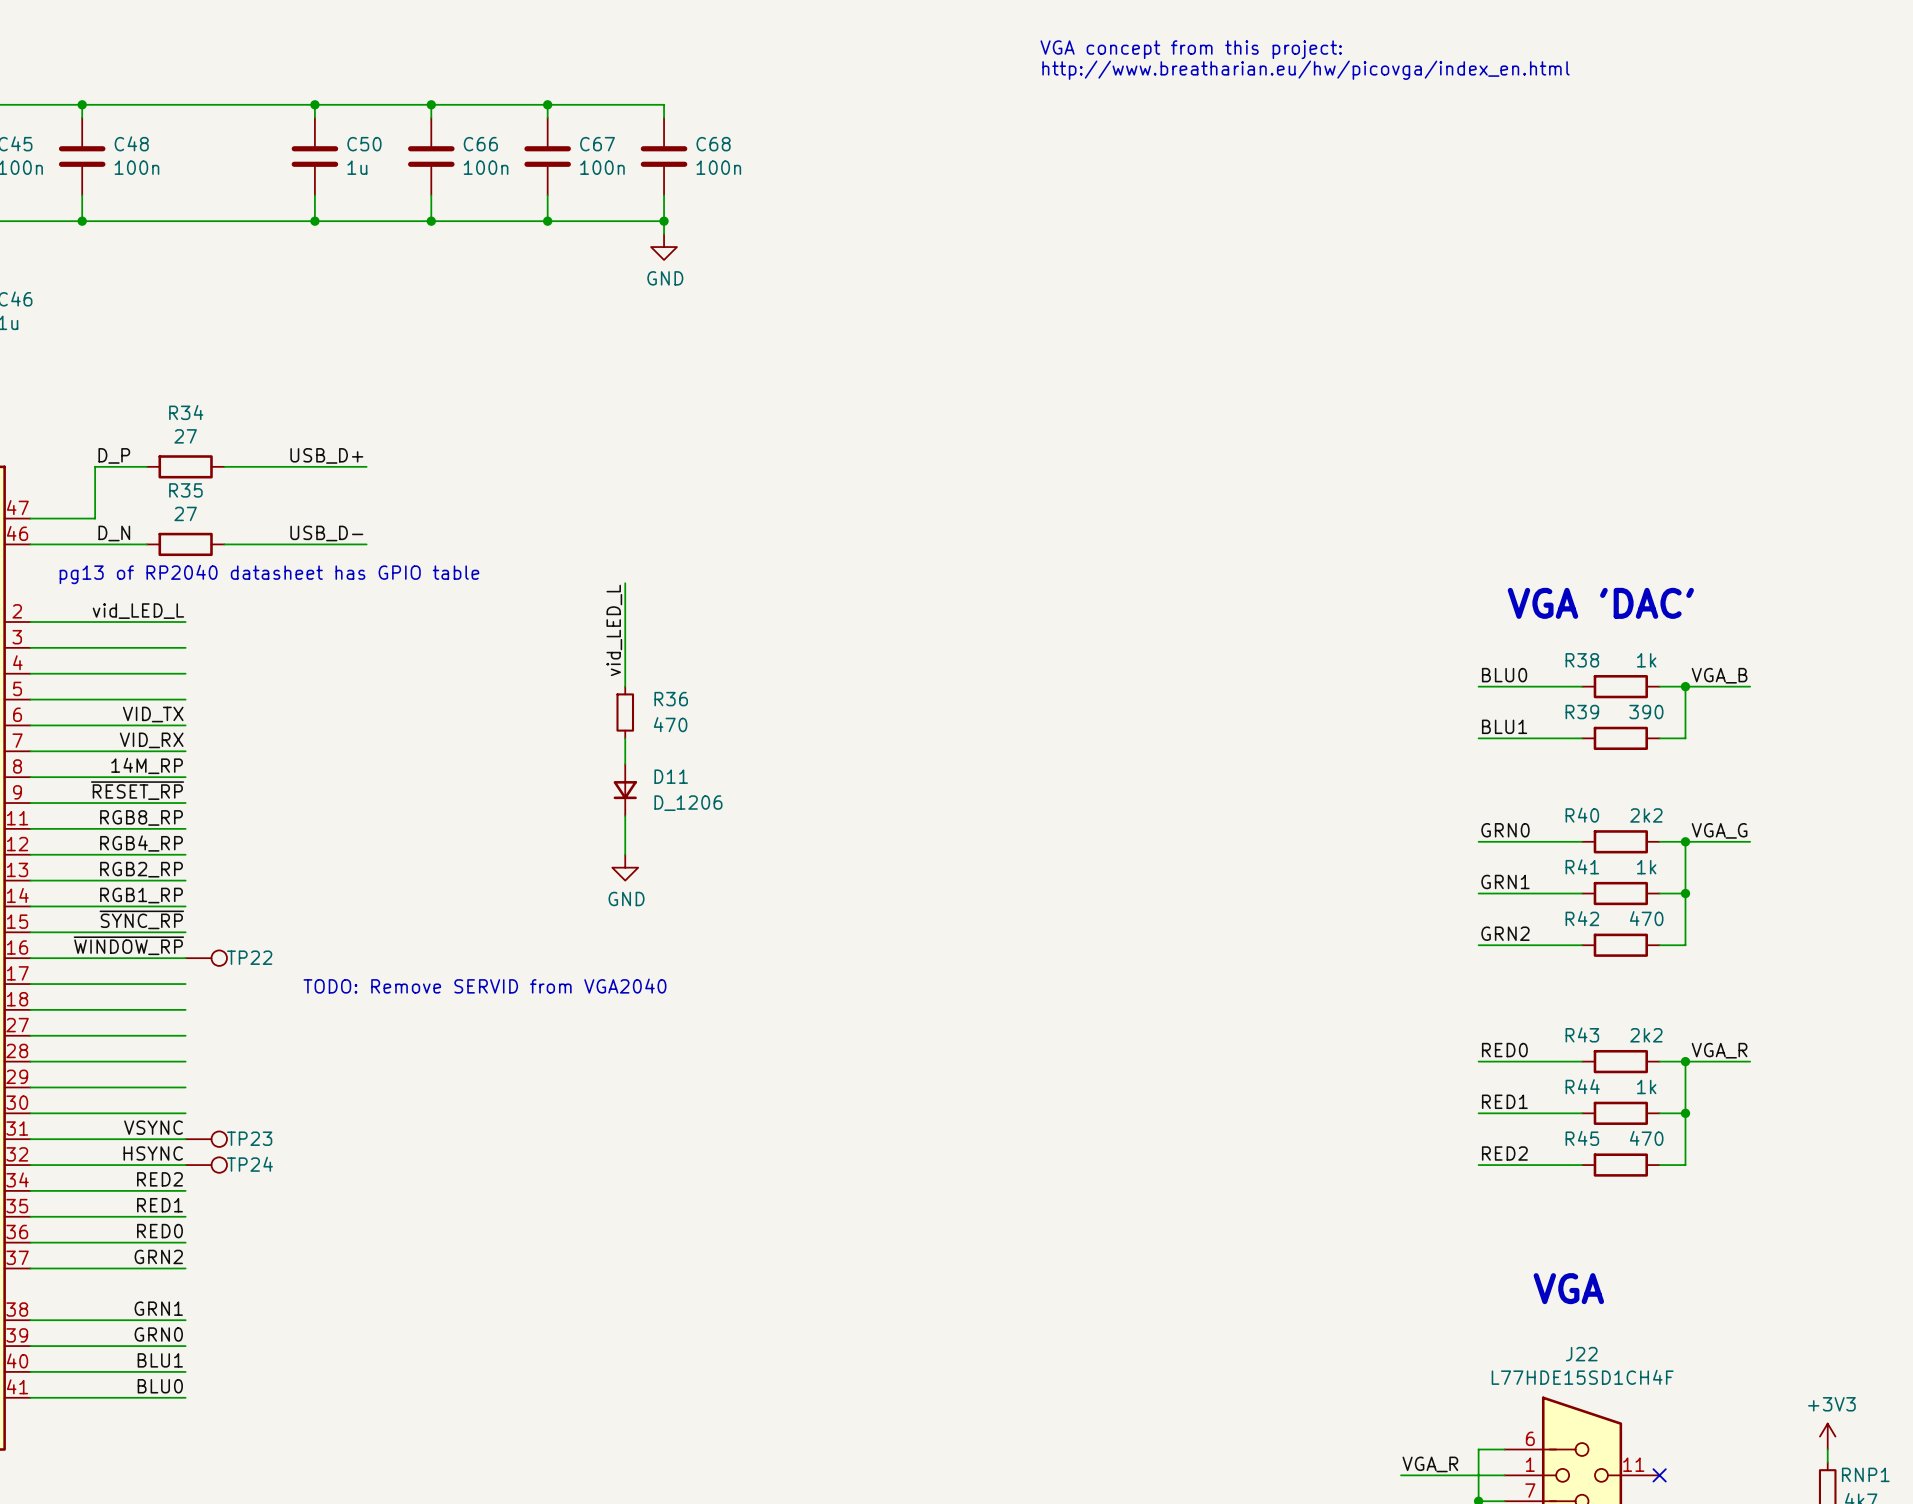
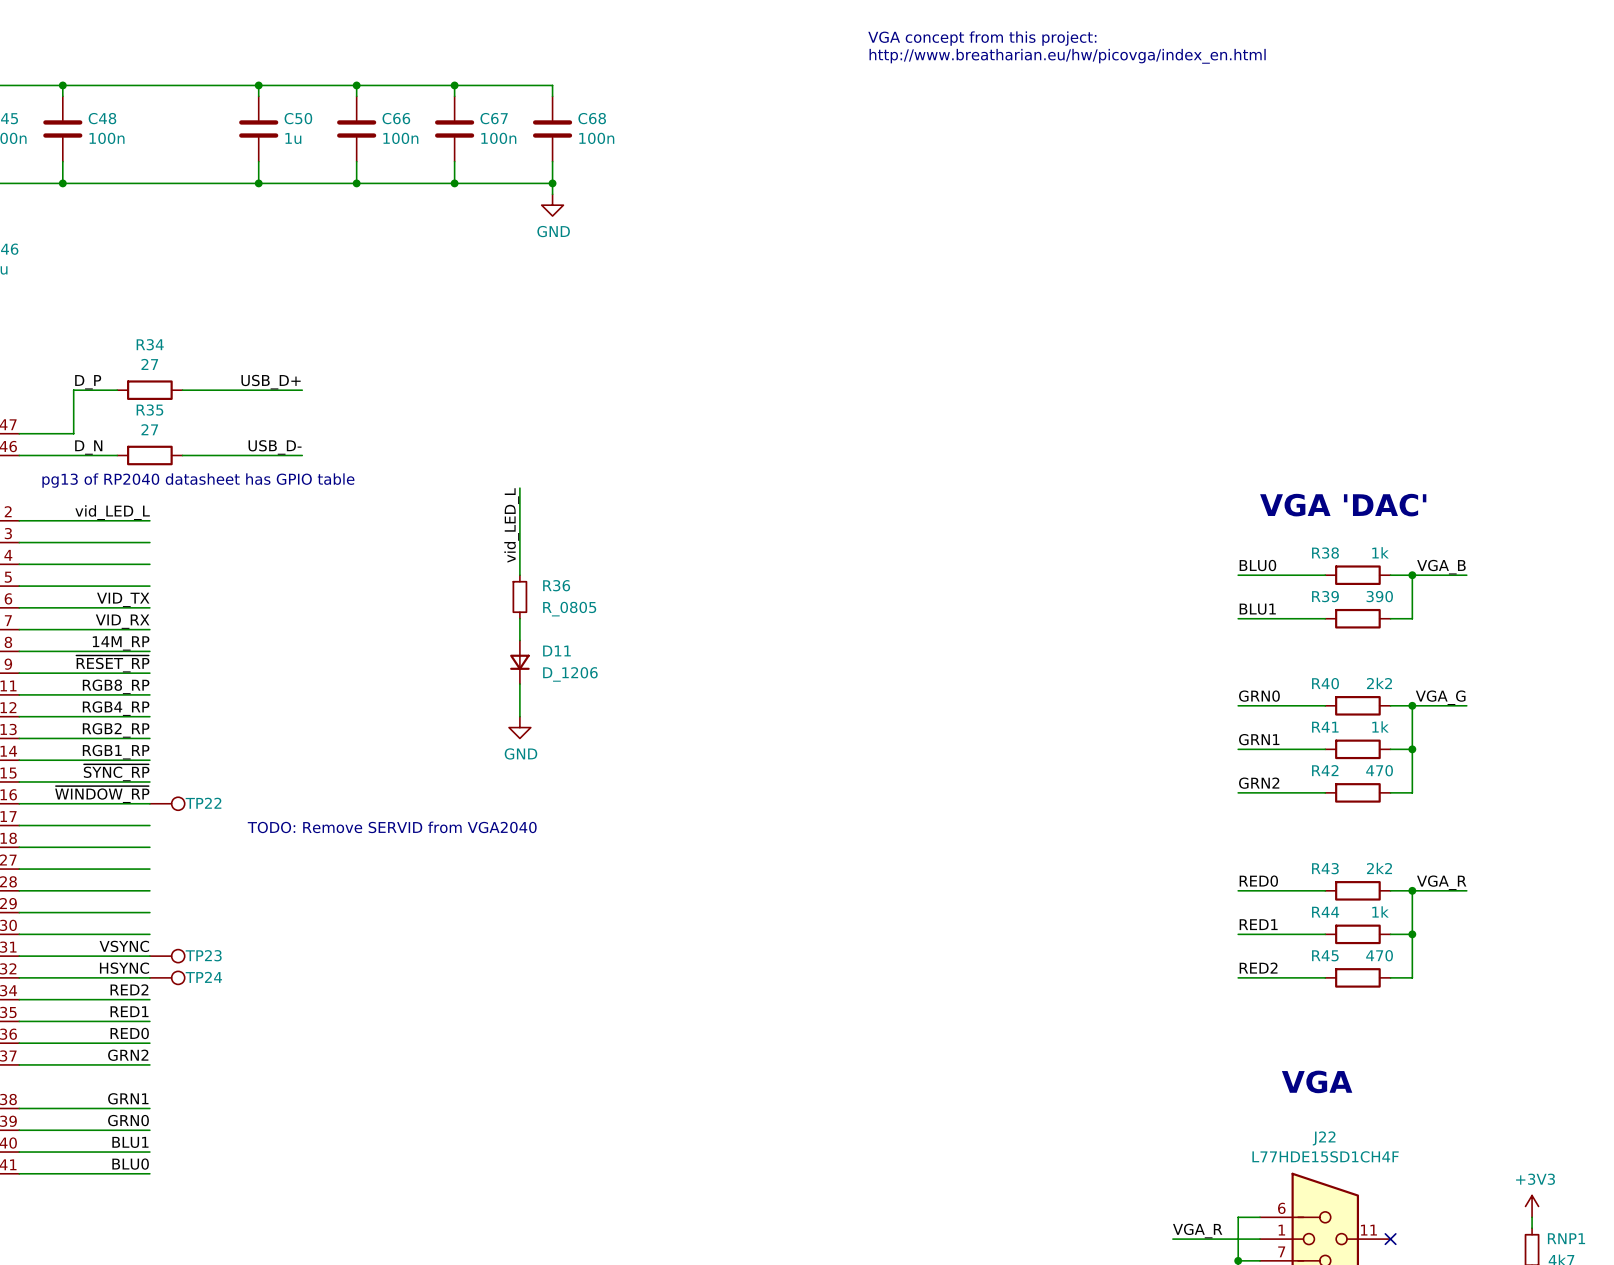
R36 value: 470 (670, 724) -> R_0805 (569, 609)

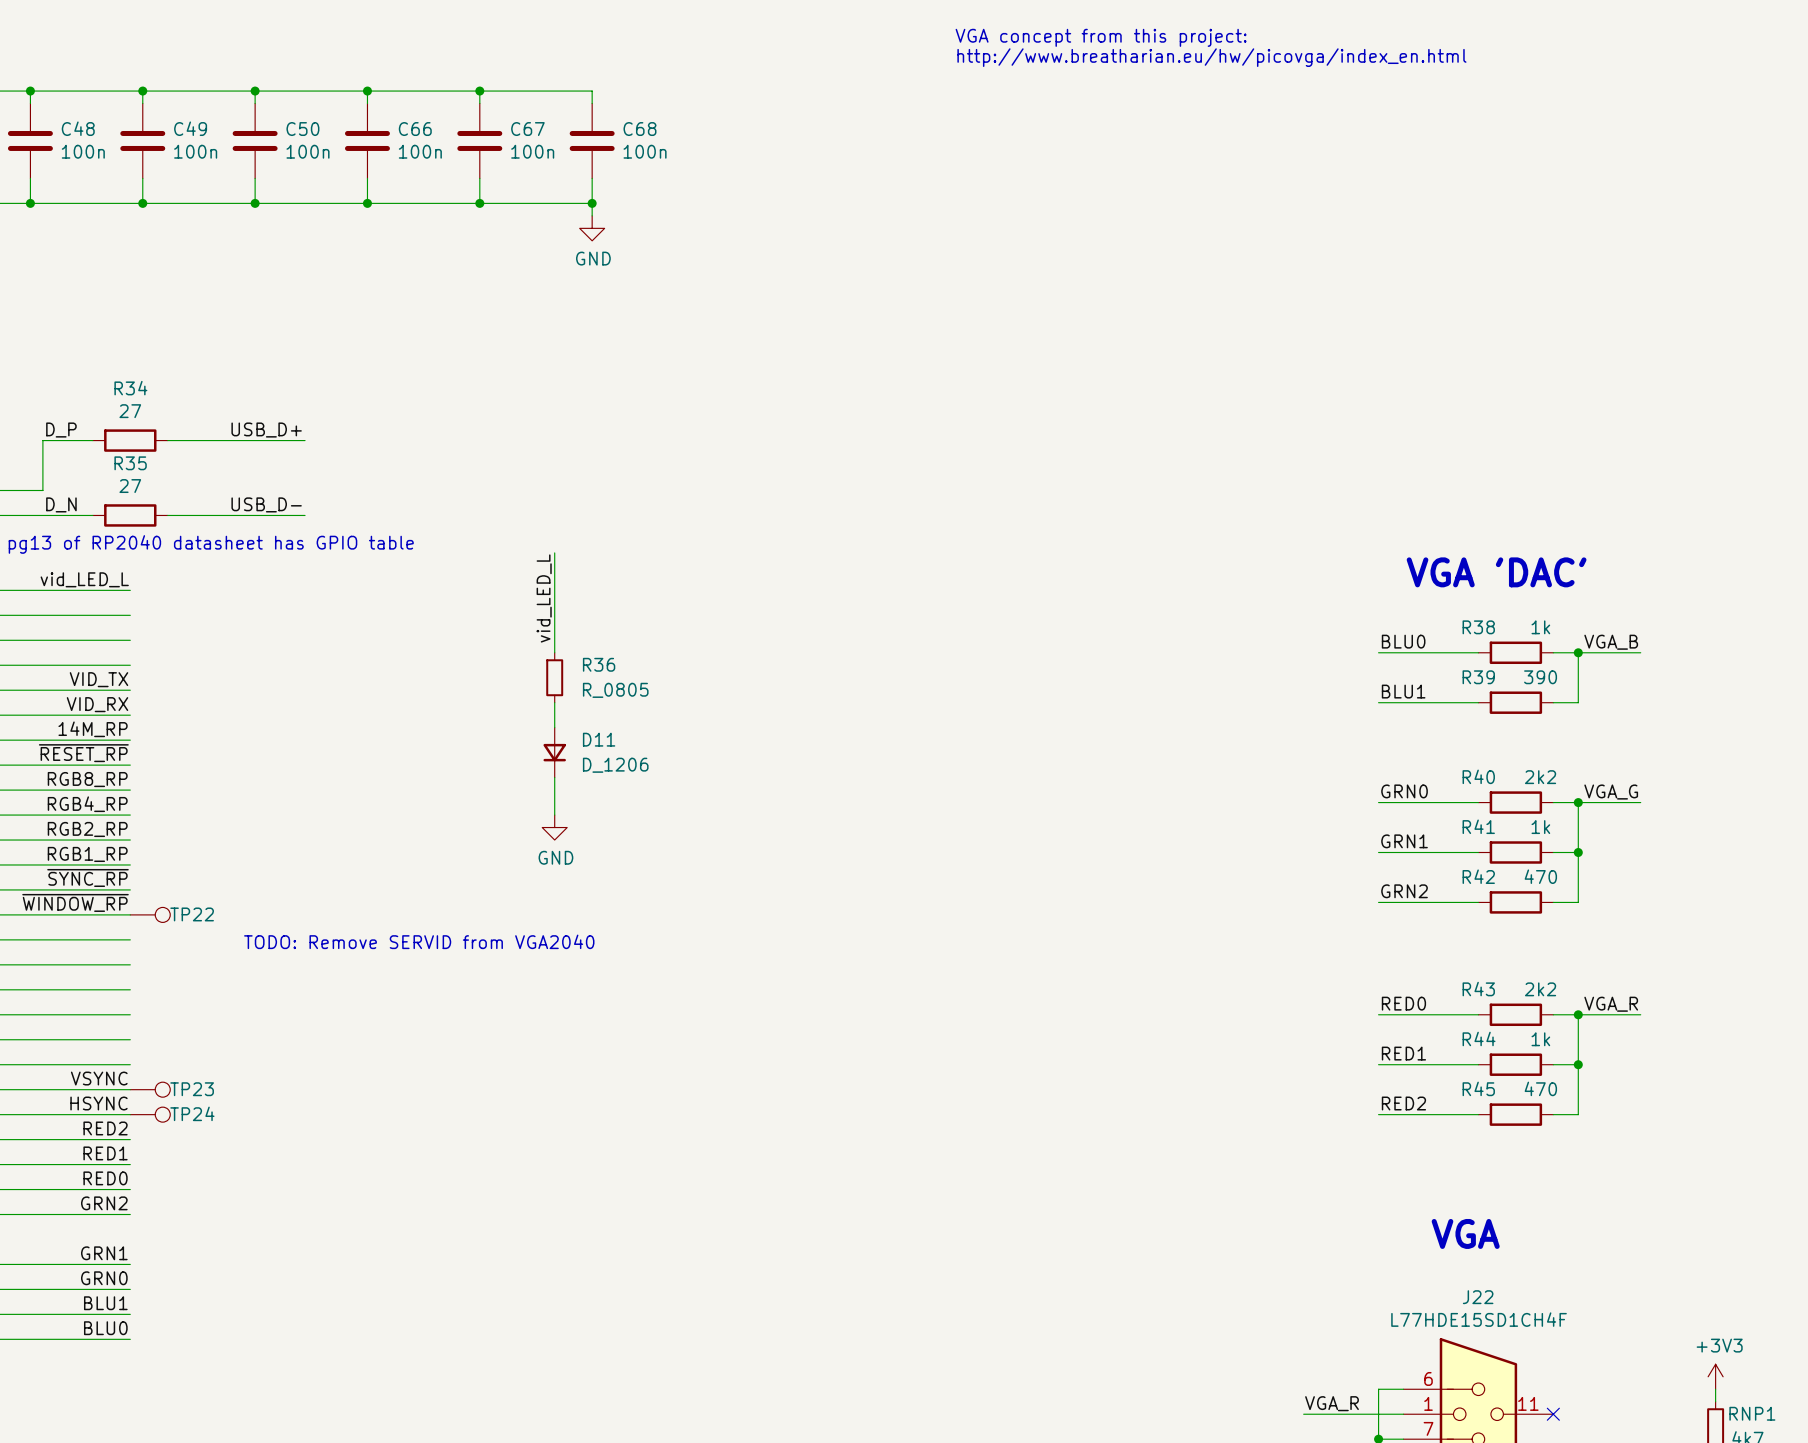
wire: none -> (142, 91) (142, 103)
junction: none -> (142, 91)
C49: none -> 100n (142, 140)
C50 value: 1u (293, 138) -> 100n (308, 151)
wire: none -> (142, 178) (142, 203)
junction: none -> (142, 203)

